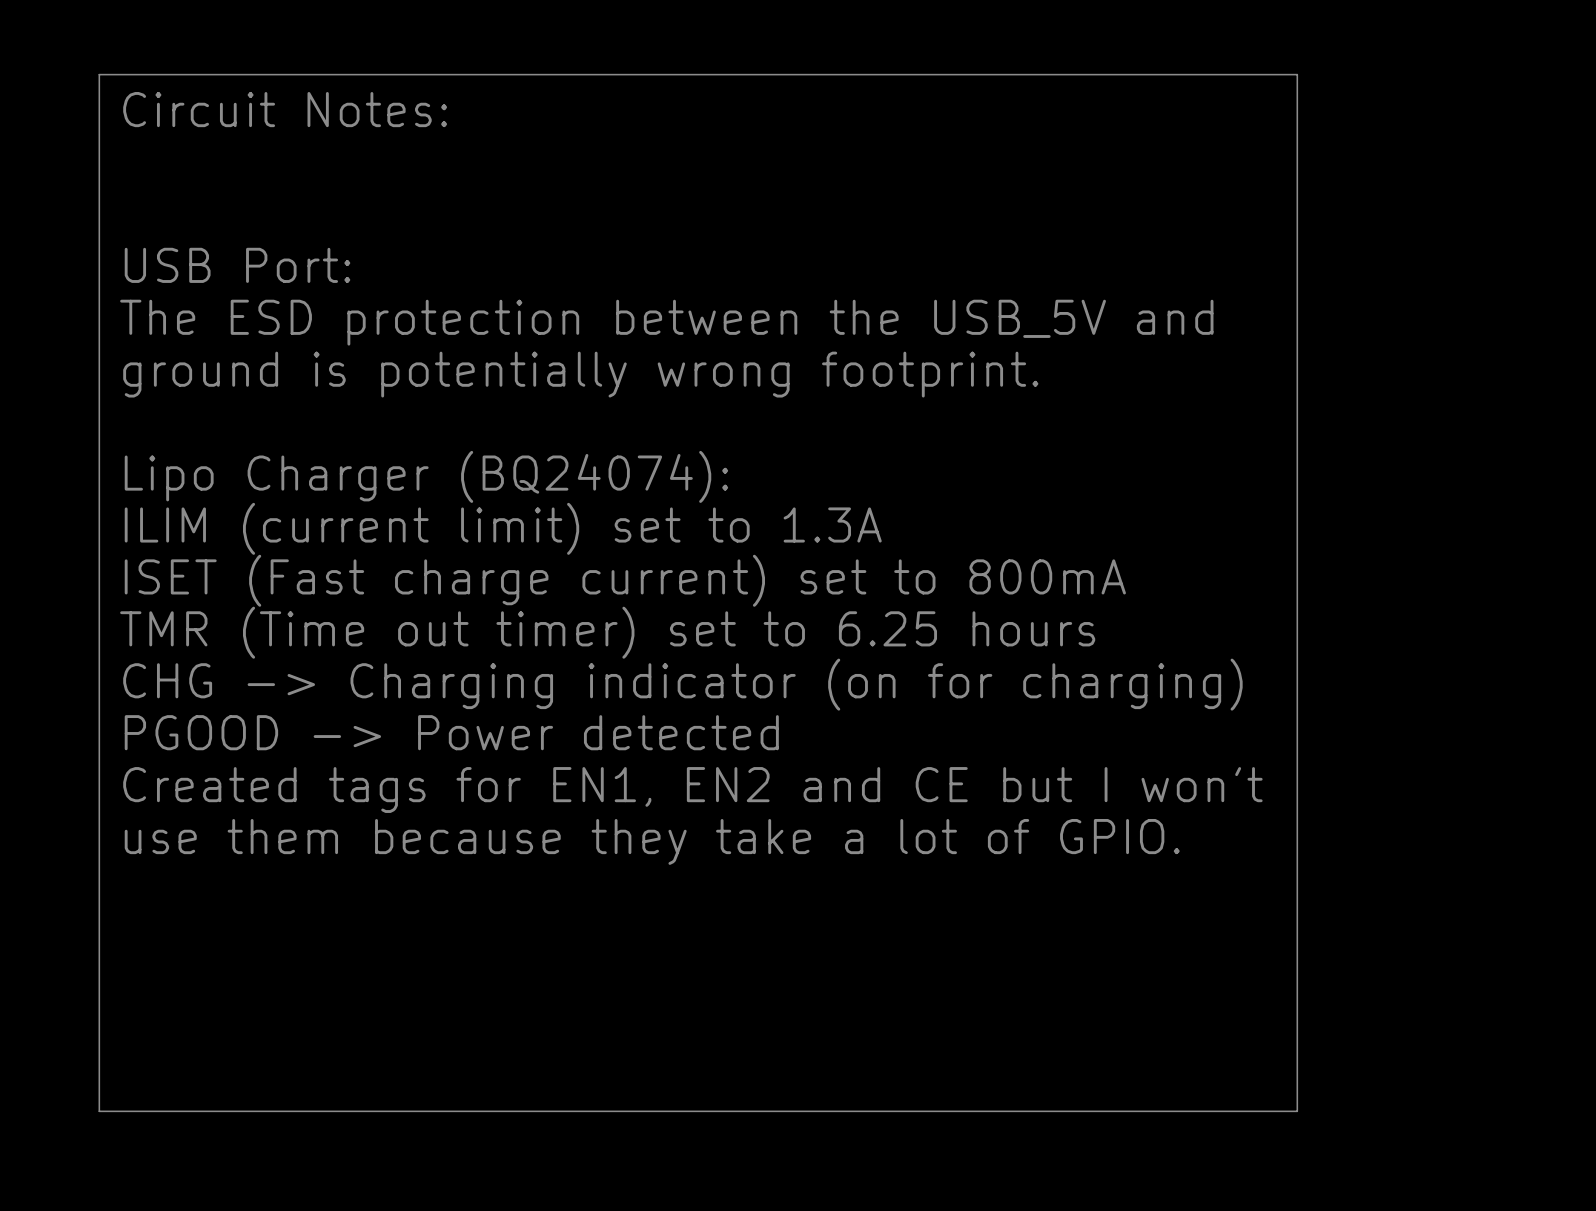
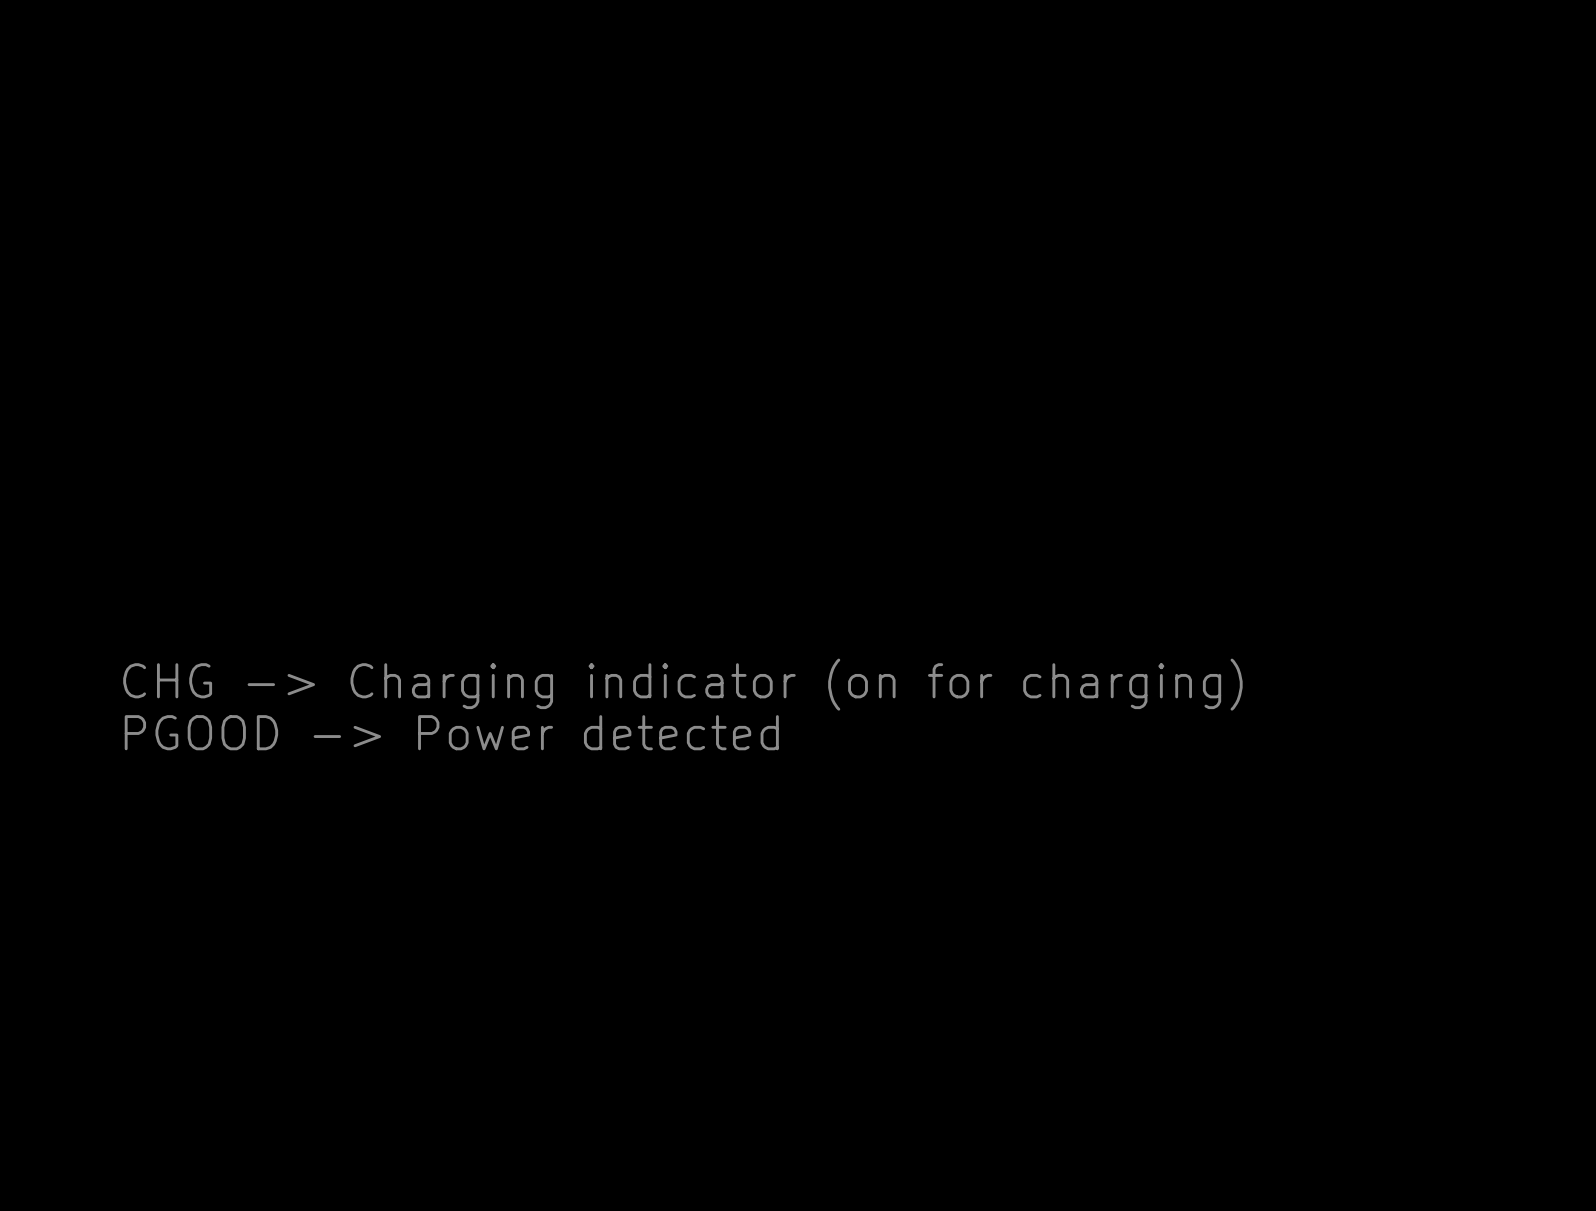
line: (99, 74) (1297, 74) (1297, 1111) (99, 1111) (99, 74) -> none
text: Circuit Notes: (285, 109) -> none
text: USB Port: (237, 265) -> none
text: The ESD protection between the USB_5V and (666, 322) -> none
text: ground is potentially wrong footprint. (580, 374) -> none
text: Lipo Charger (BQ24074): (426, 476) -> none
text: ILIM (current limit) set to 1.3A (503, 528) -> none
text: ISET (Fast charge current) set to 800mA (625, 580) -> none
text: TMR (Time out timer) set to 6.25 hours (607, 632) -> none
text: Created tags for EN1, EN2 and CE but I won't (692, 790) -> none
text: use them because they take a lot of GPIO. (652, 841) -> none

